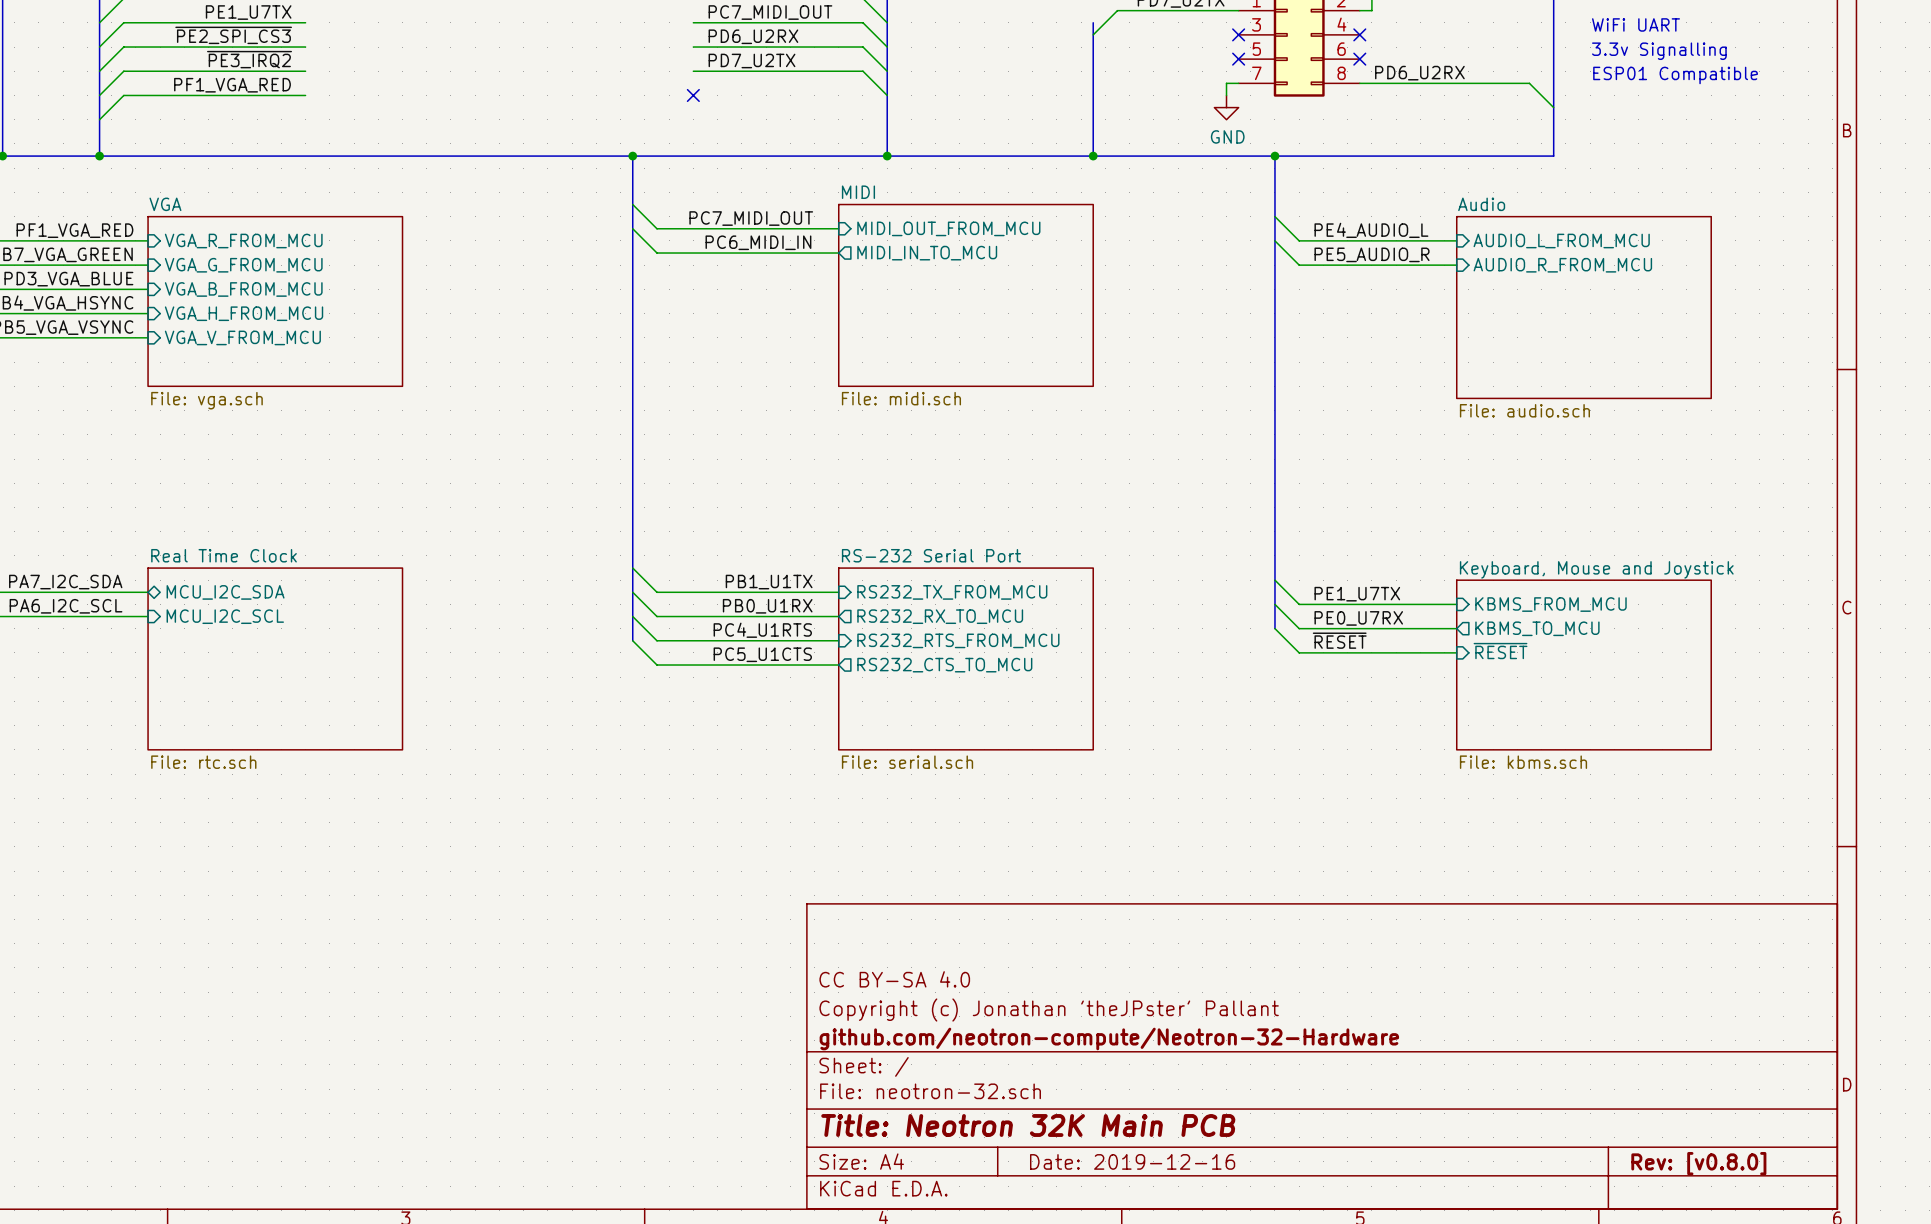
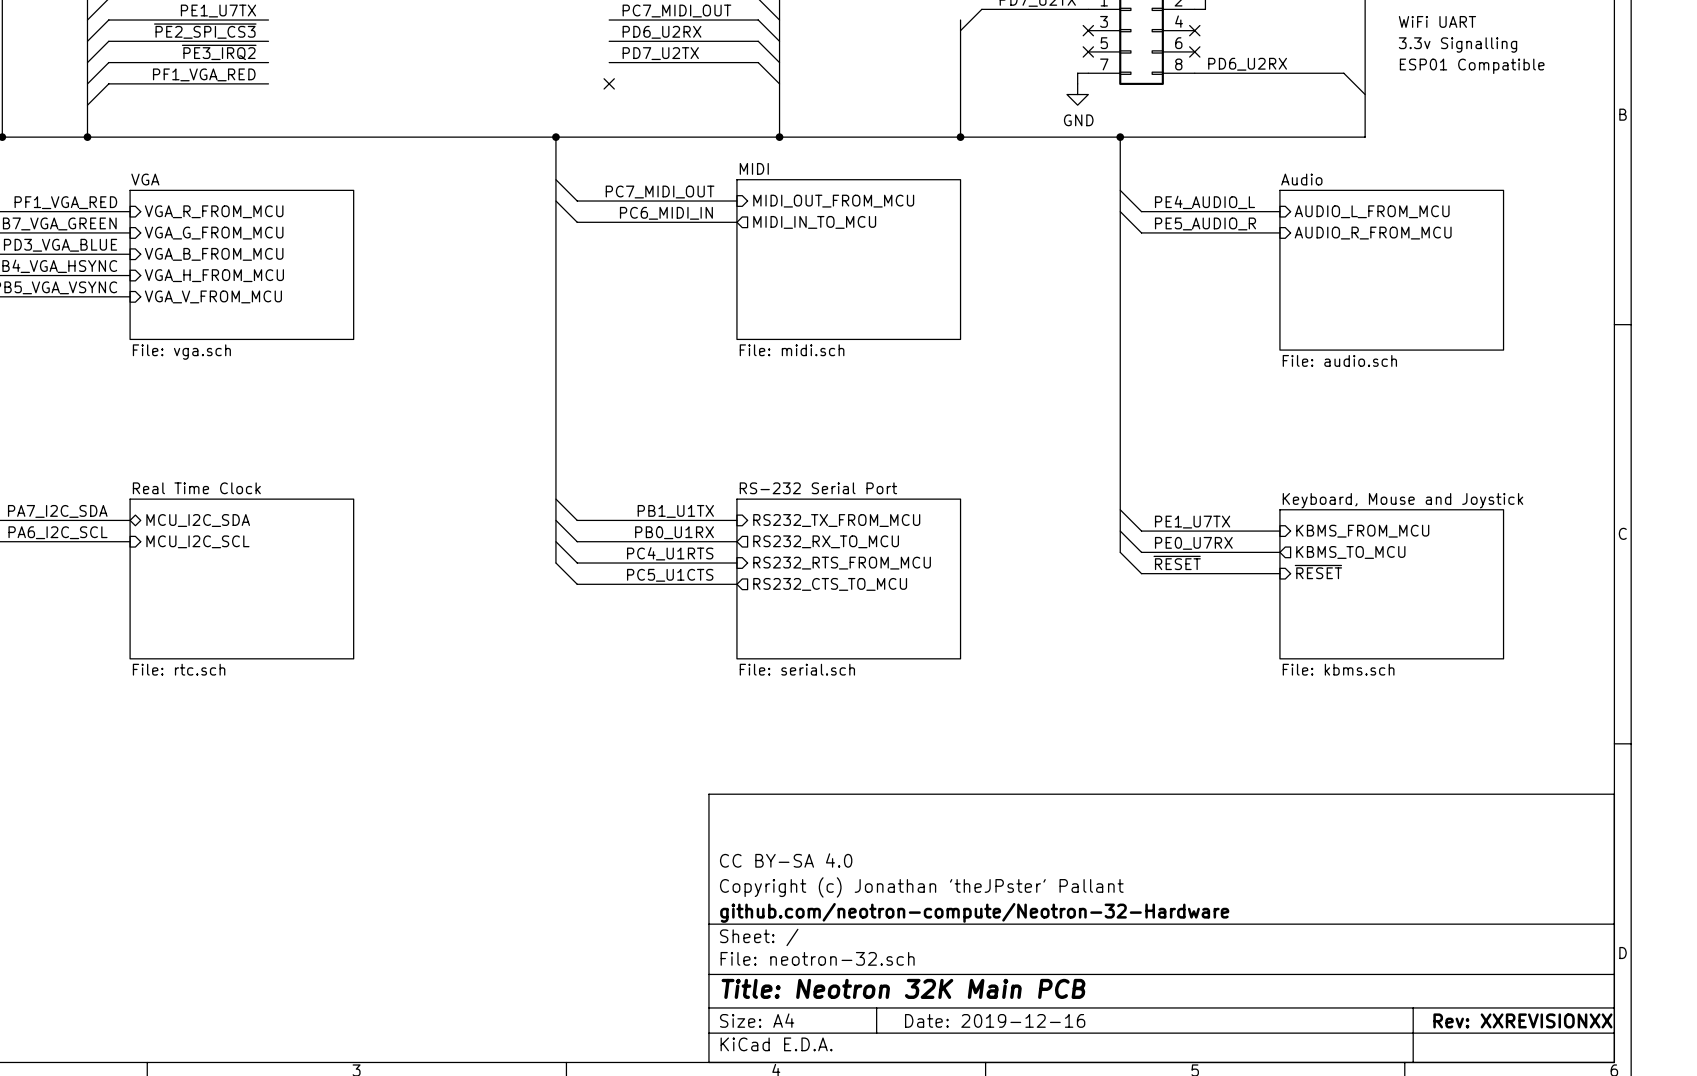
title block: Rev: [v0.8.0] (1698, 1163) -> Rev: XXREVISIONXX (1522, 1020)

